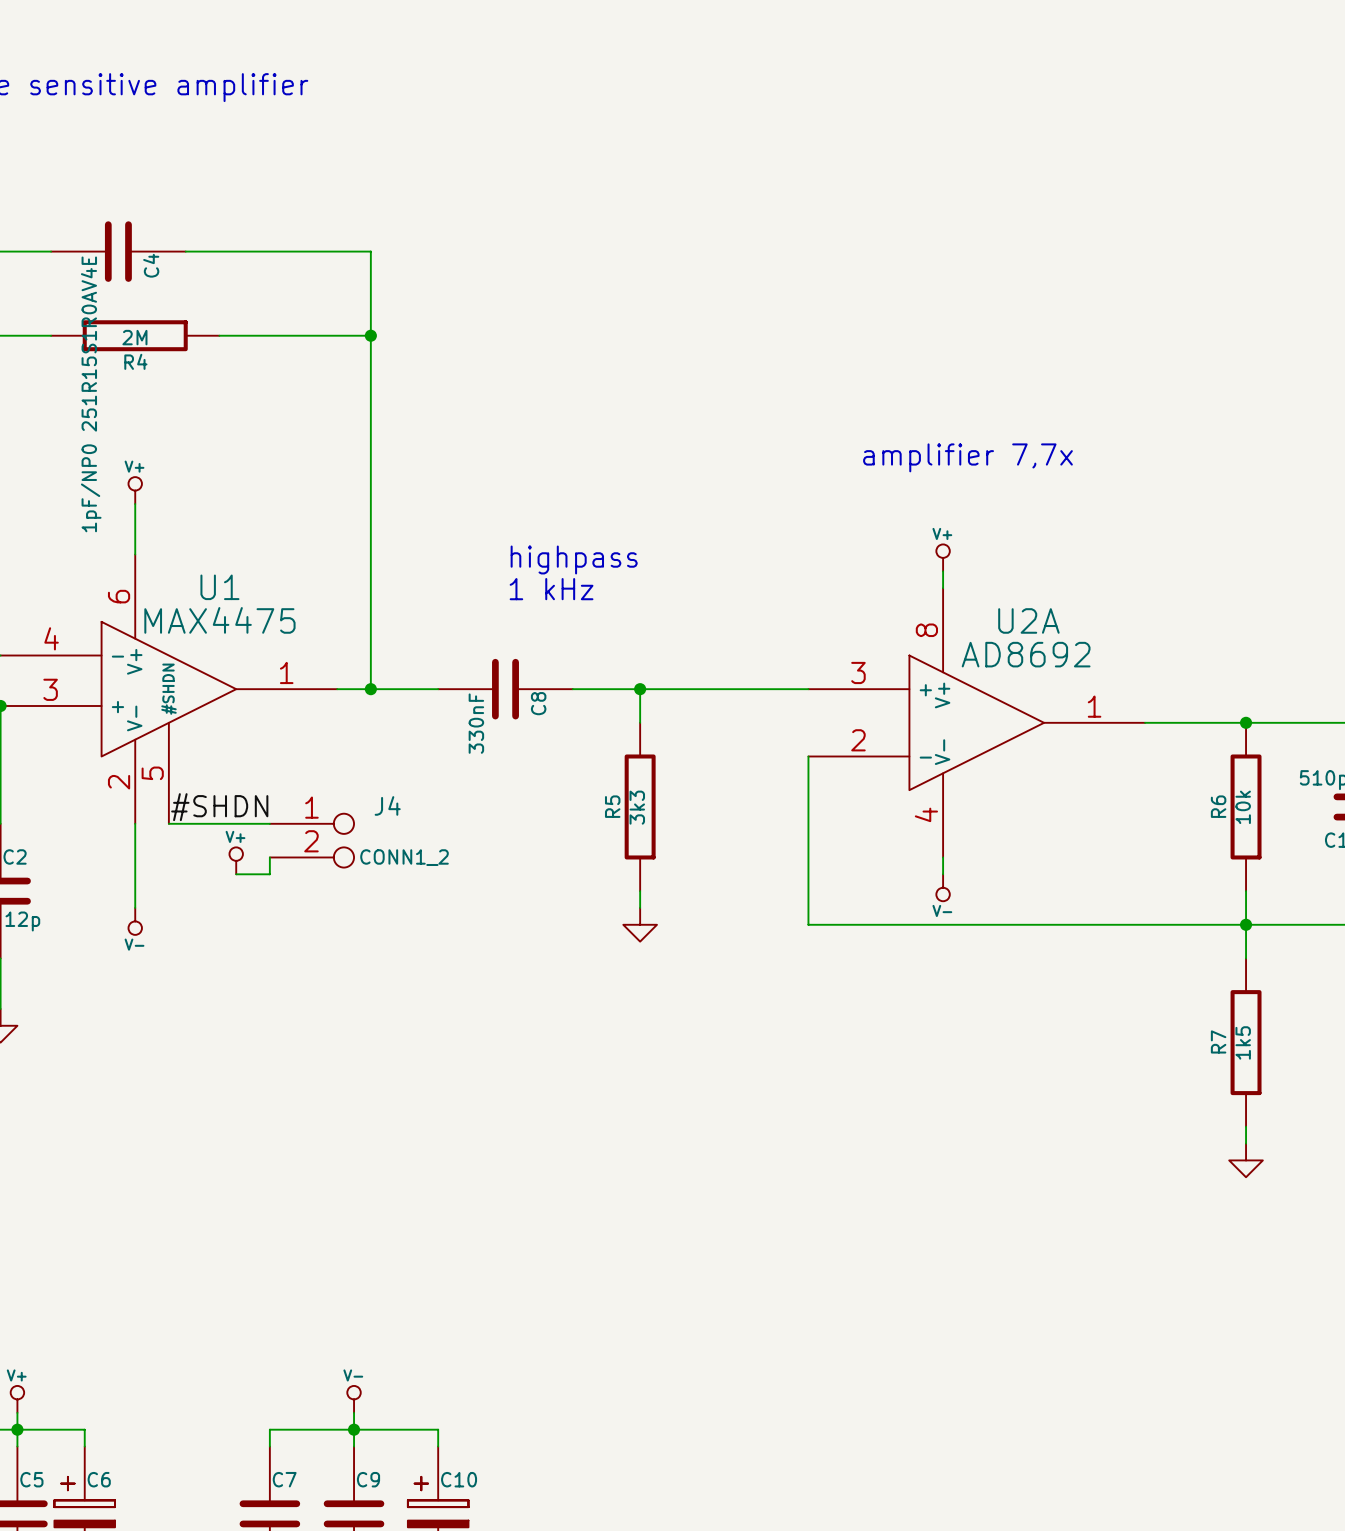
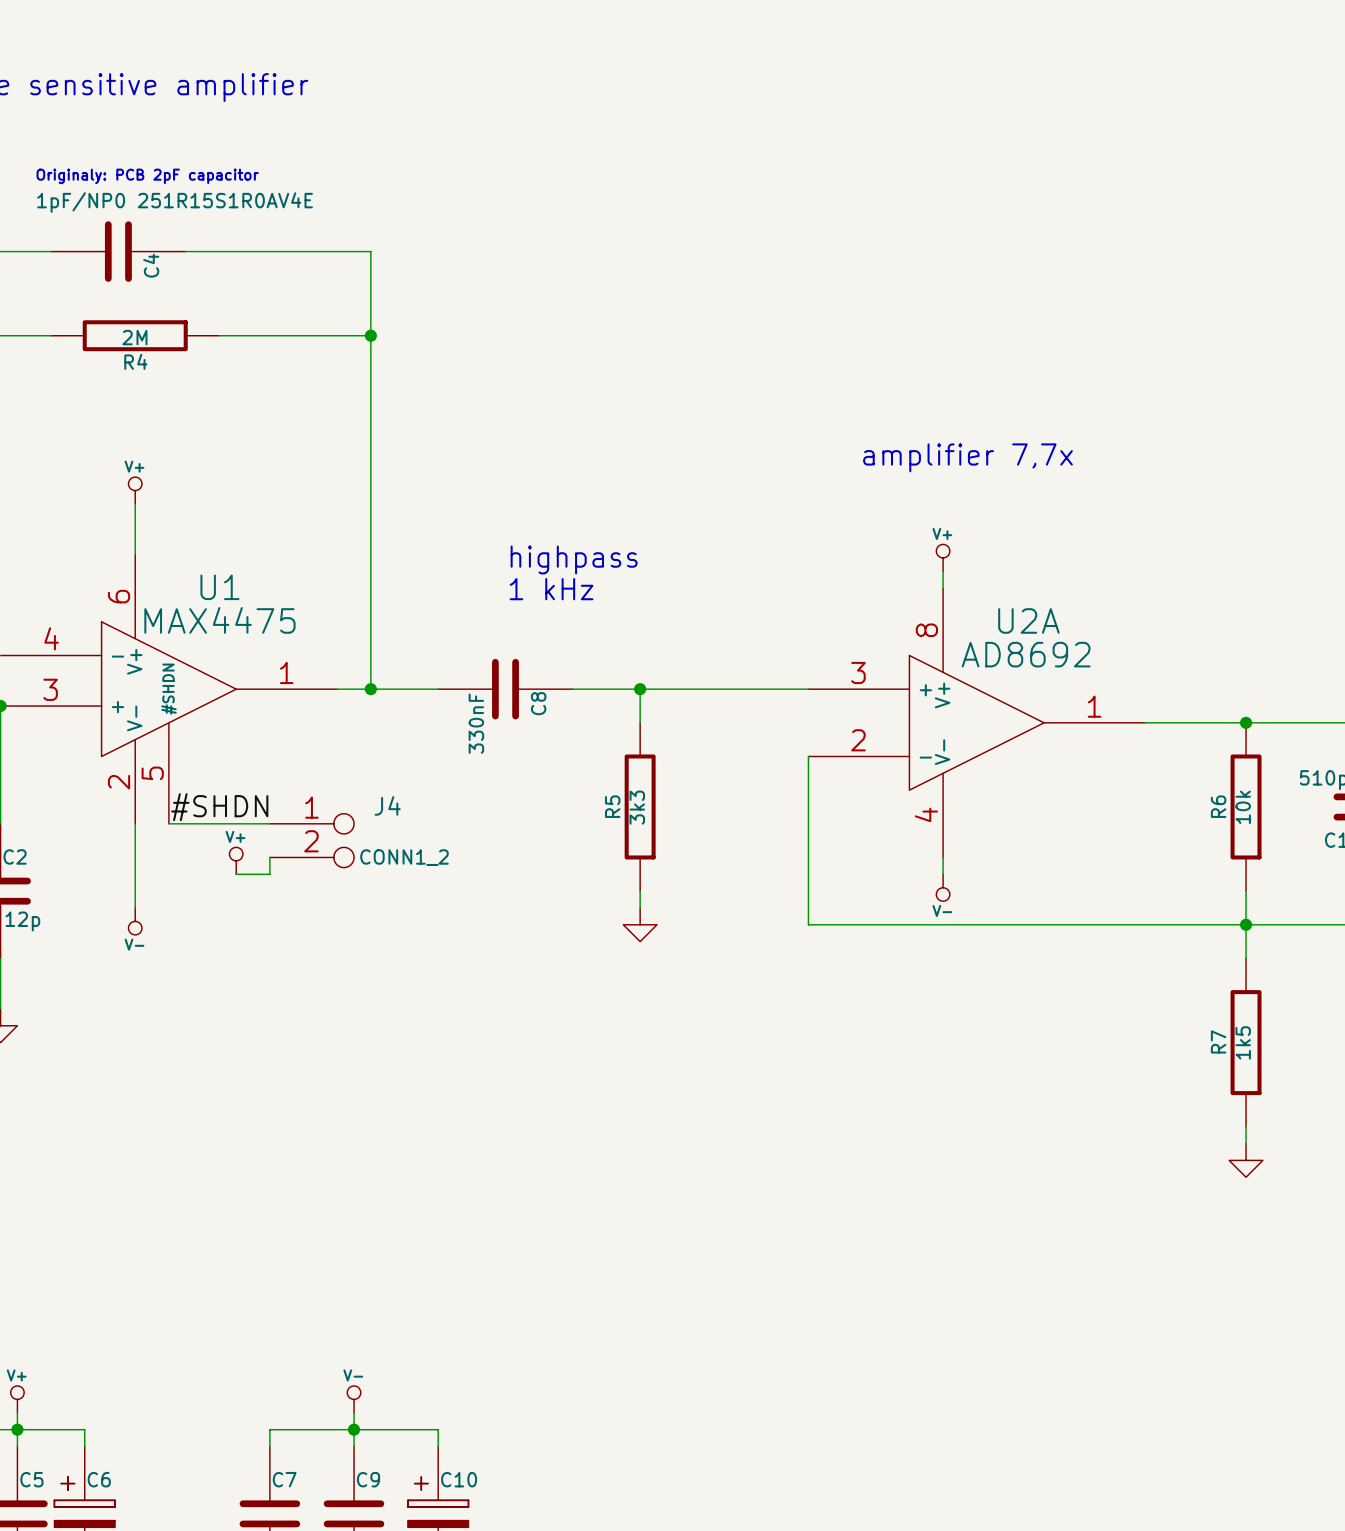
text: none -> Originaly: PCB 2pF capacitor (147, 176)
C4 value rotation: 0° (91, 394) -> 90° clockwise (175, 202)

